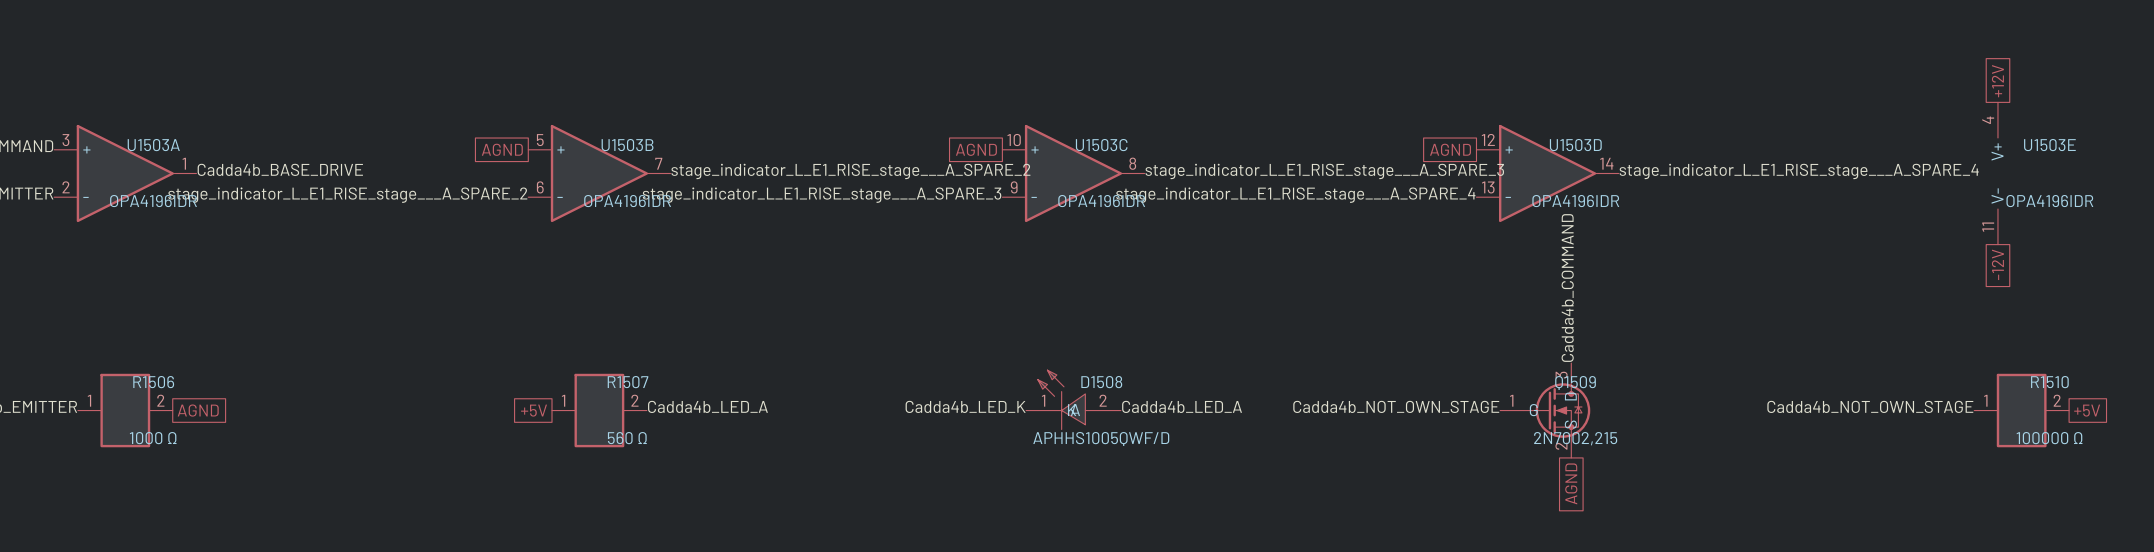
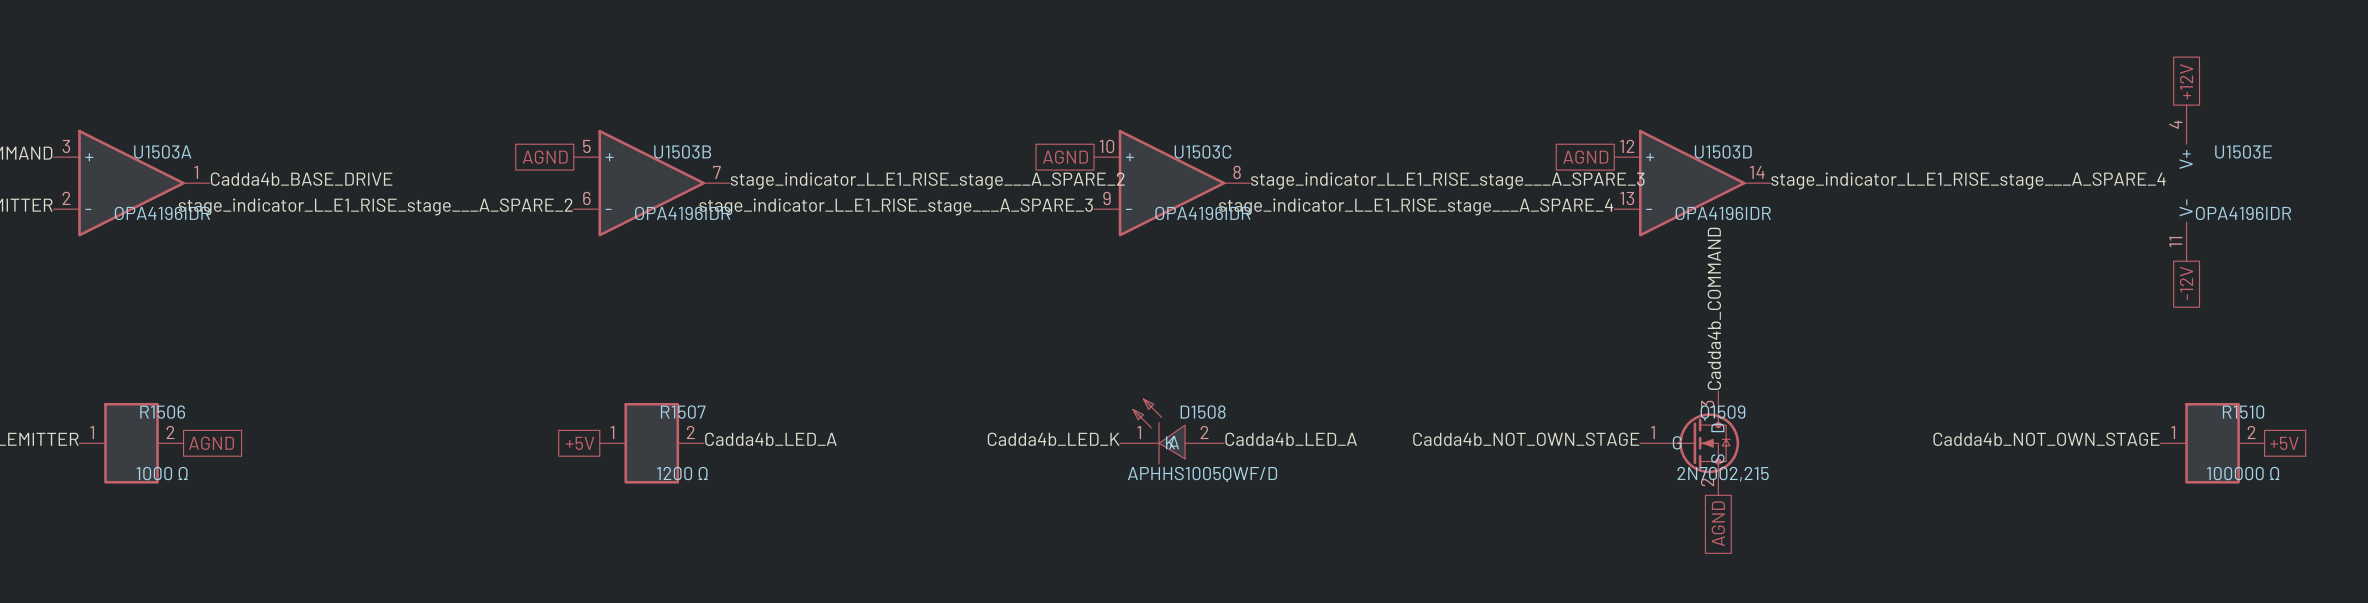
R1507 value: 560 Ω (627, 438) -> 1200 Ω (682, 473)

